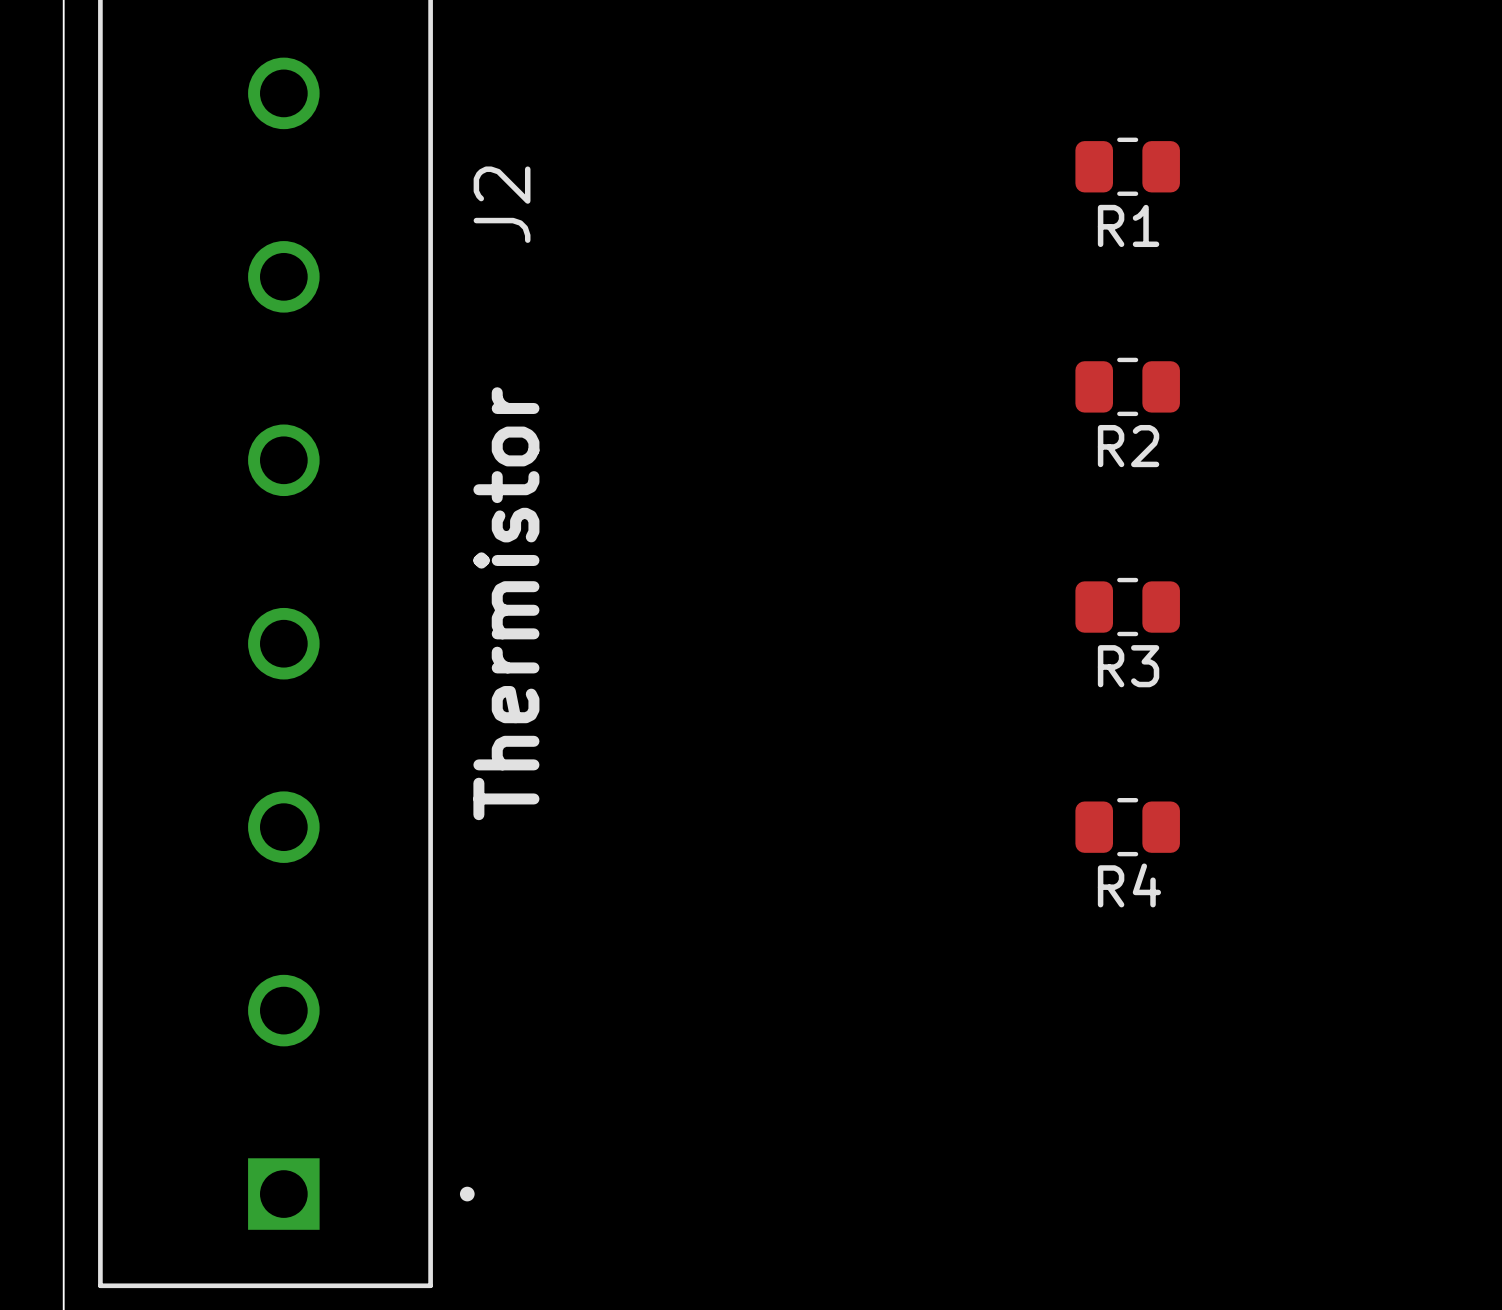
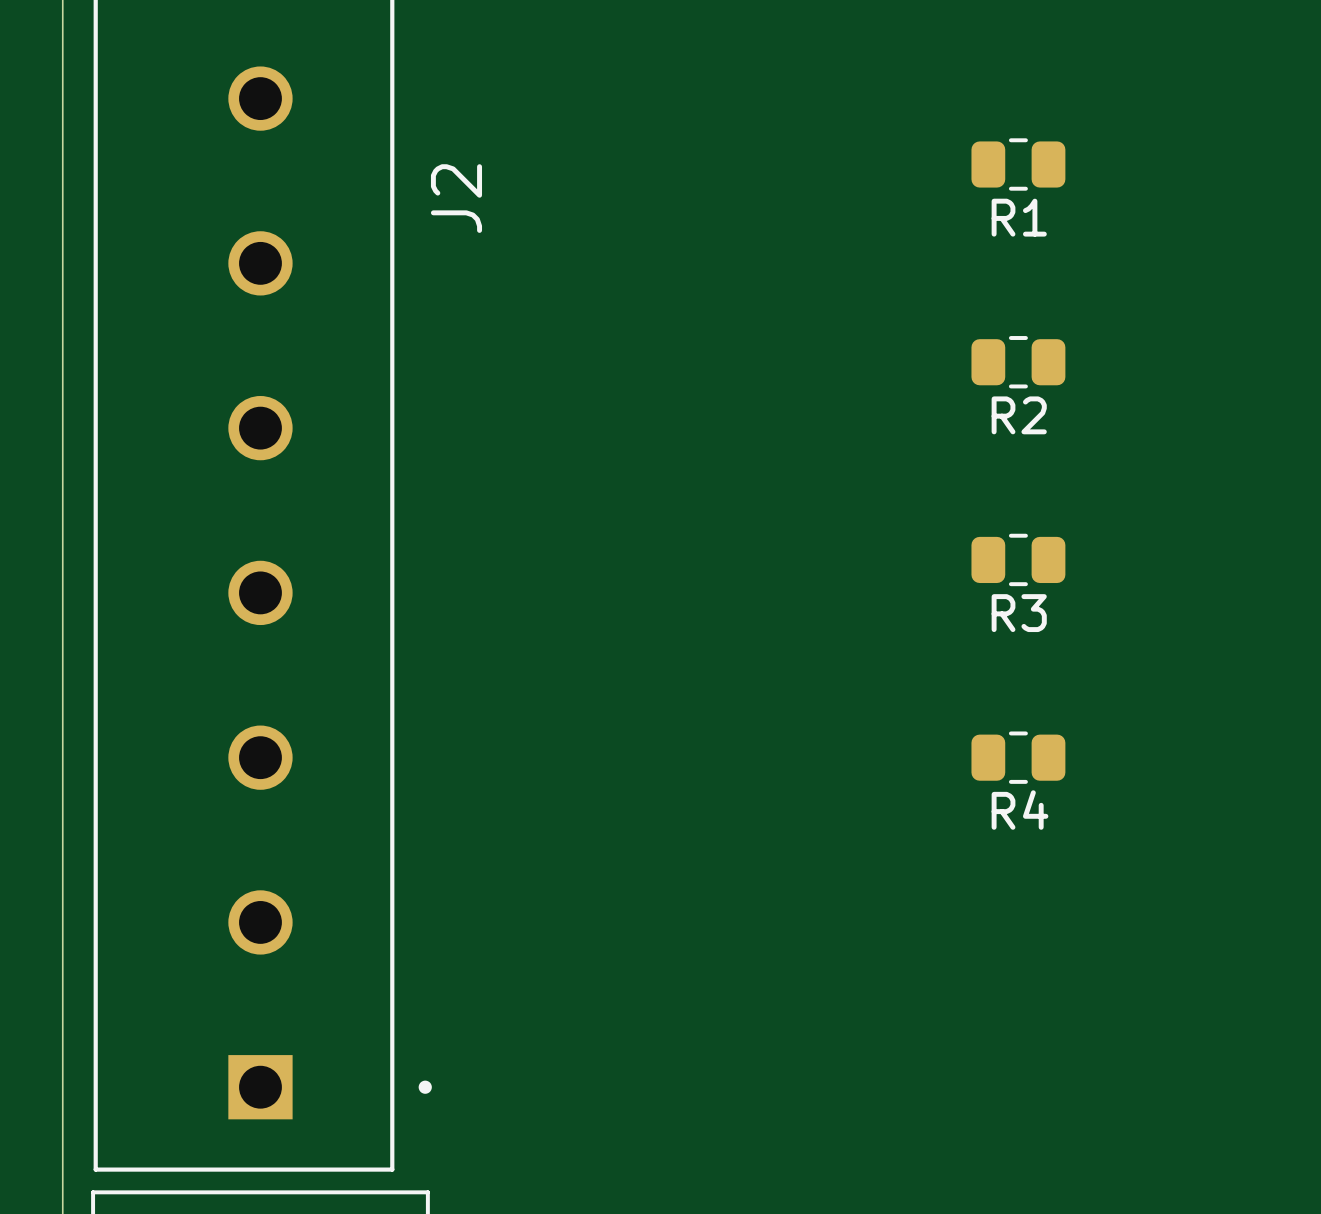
text: Thermistor (506, 603) -> none

